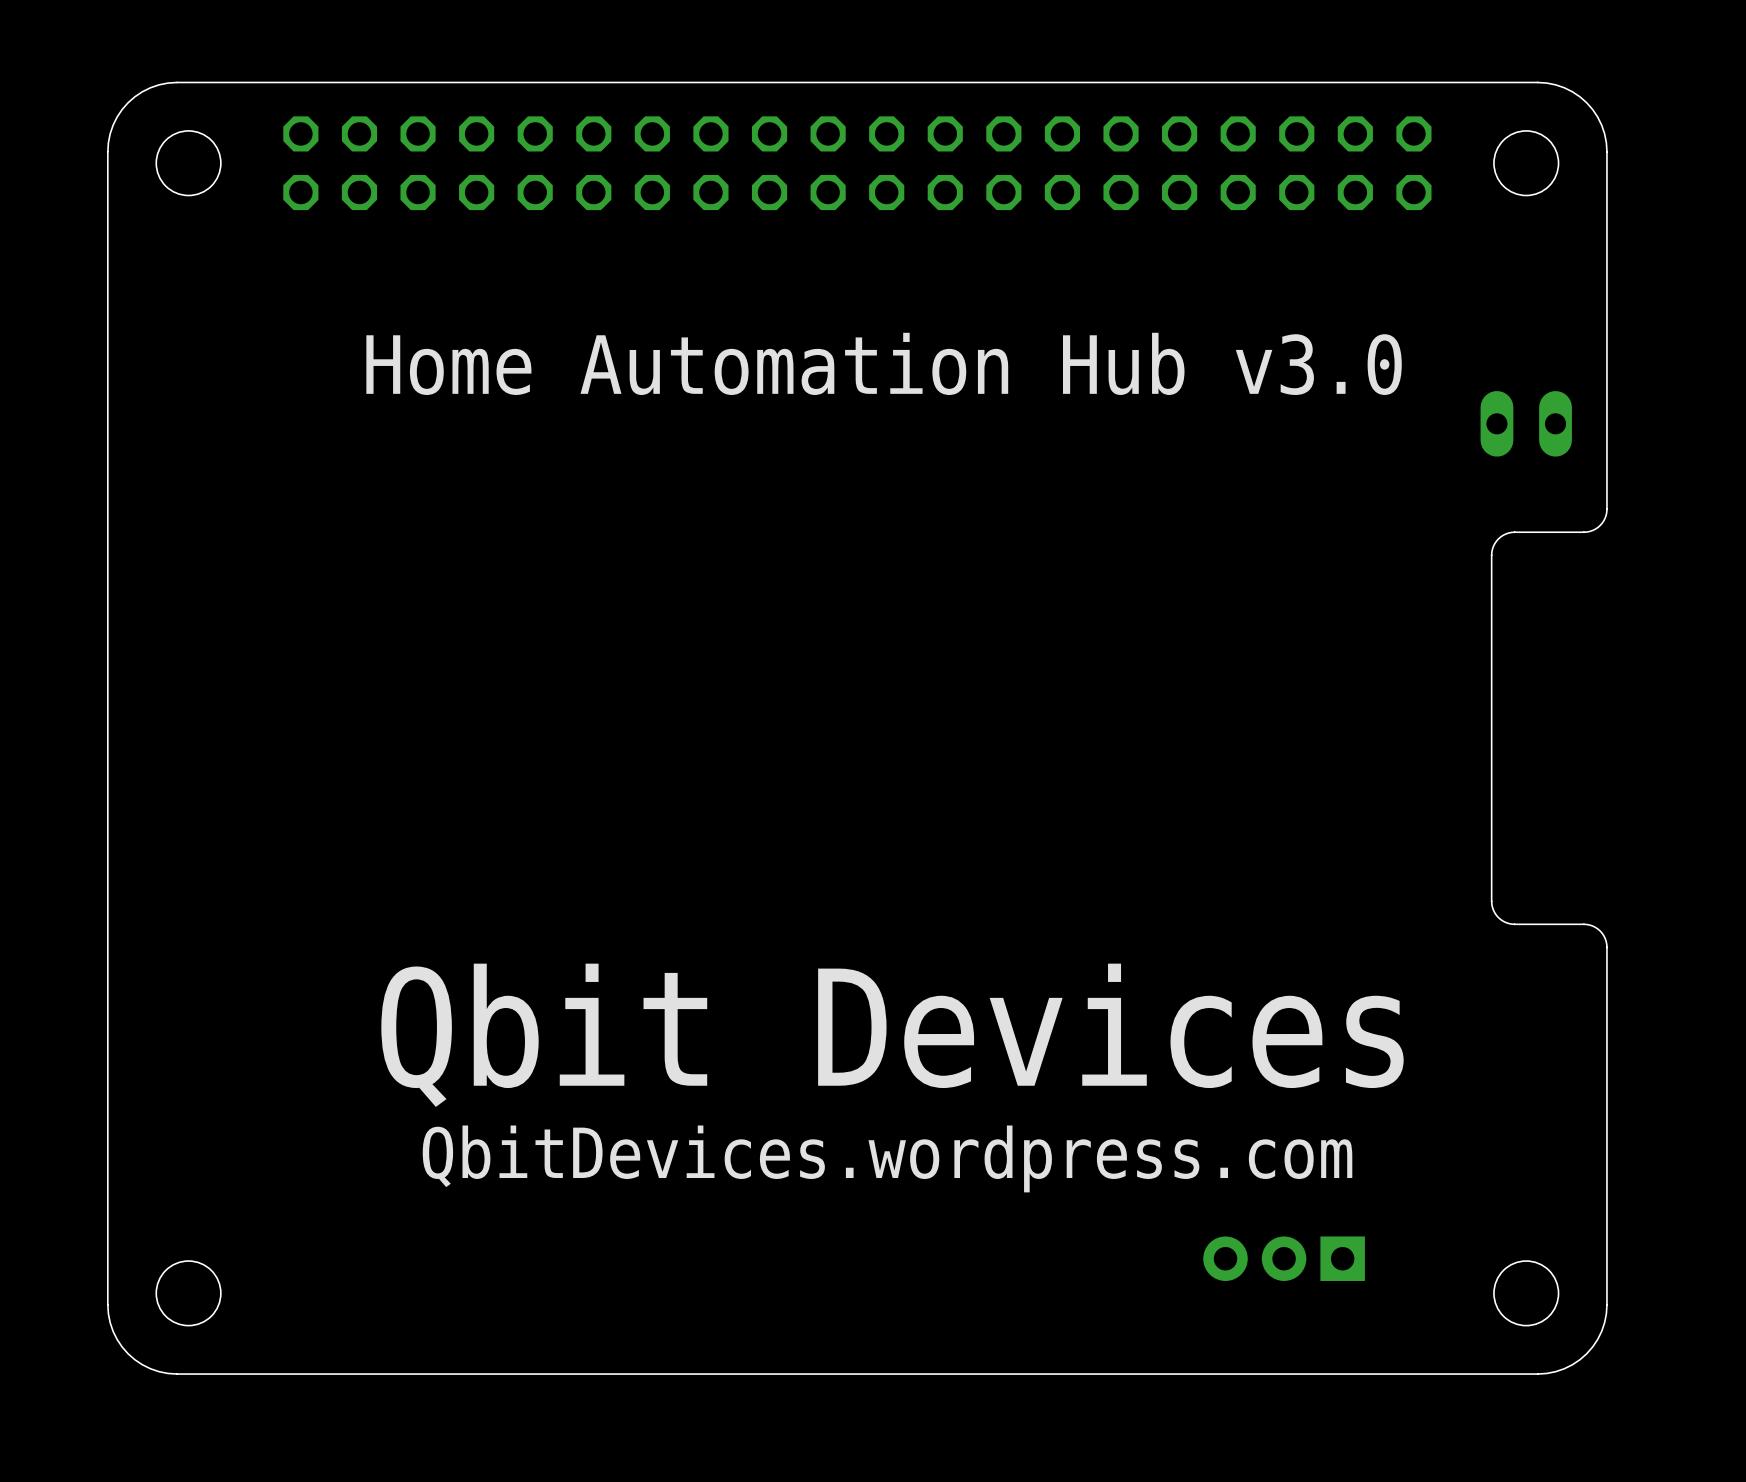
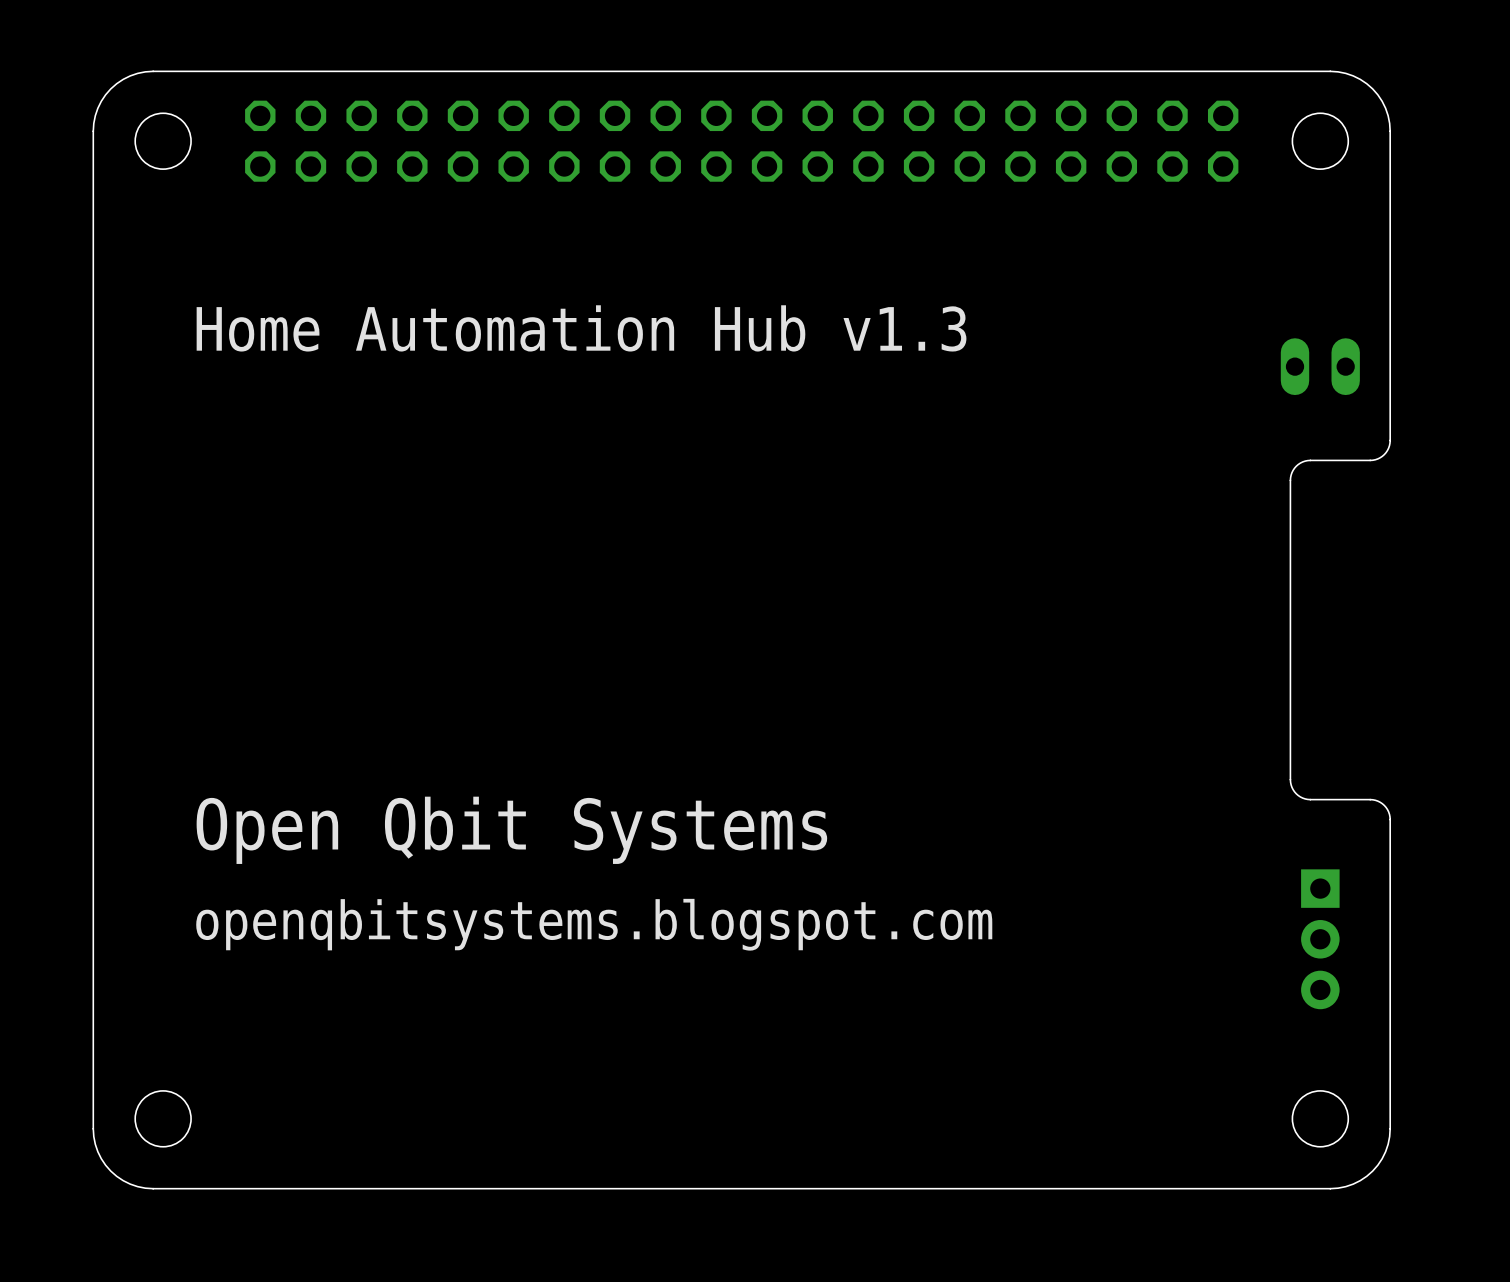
text: Home Automation Hub v3.0 (884, 363) -> Home Automation Hub v1.3 (581, 328)
text: none -> Open Qbit Systems (511, 830)
text: Qbit Devices (892, 1035) -> none
text: none -> openqbitsystems.blogspot.com (594, 924)
text: QbitDevices.wordpress.com (887, 1158) -> none
part rotation: 0° (1284, 1258) -> 90° counterclockwise (1320, 939)
part position: (1284, 1258) -> (1320, 939)

